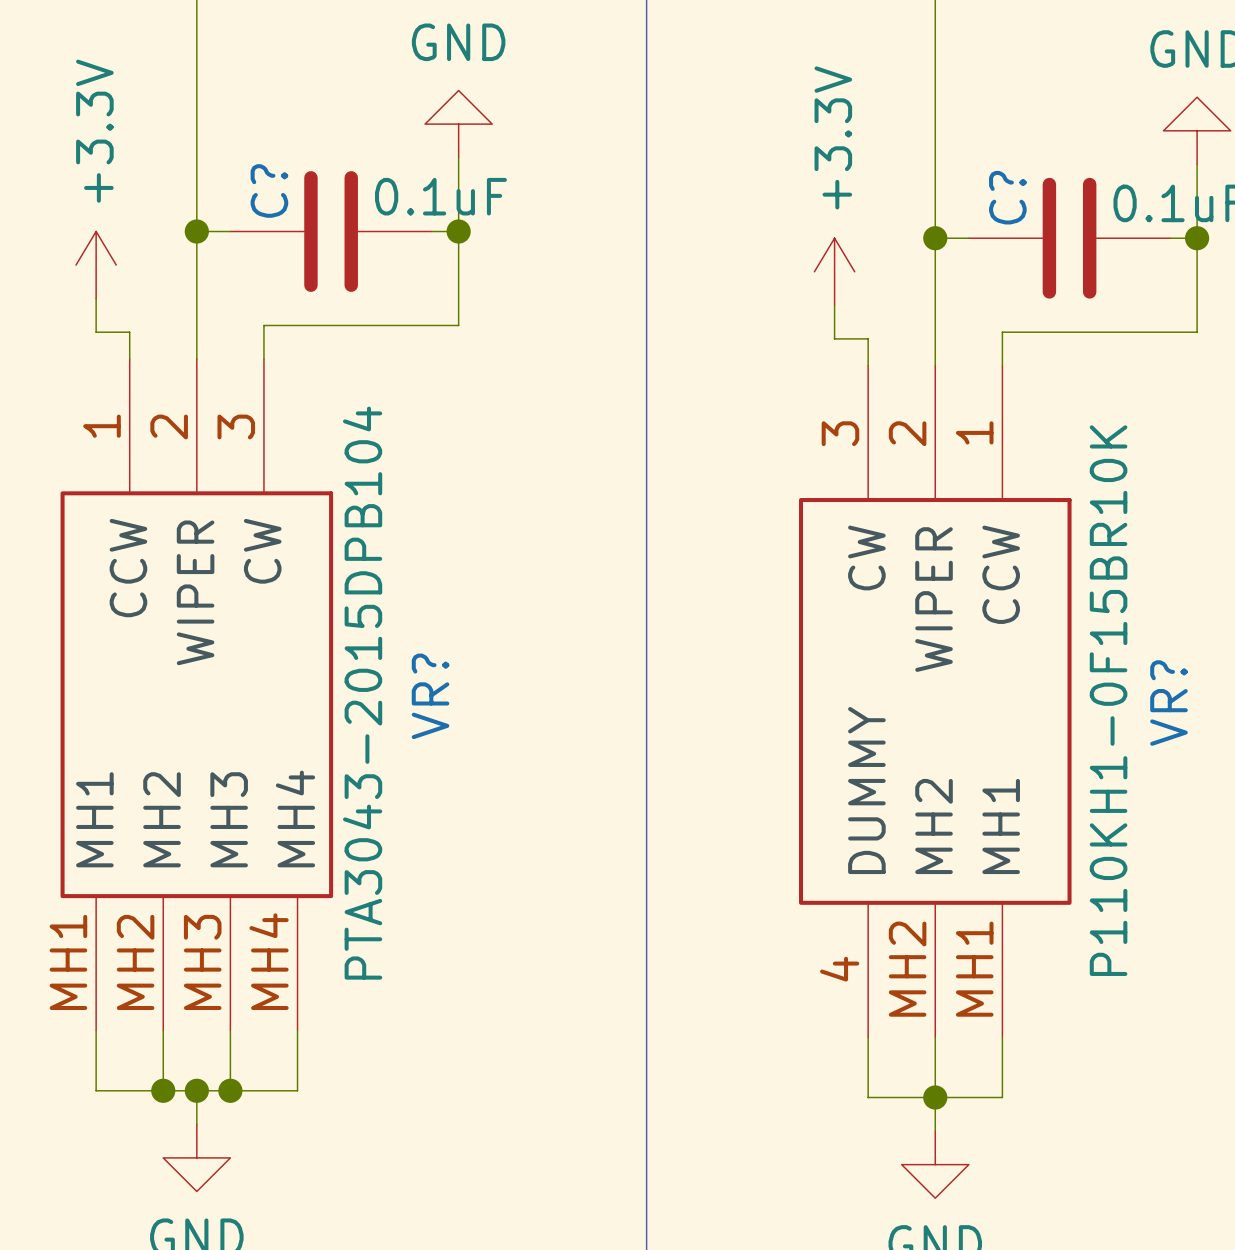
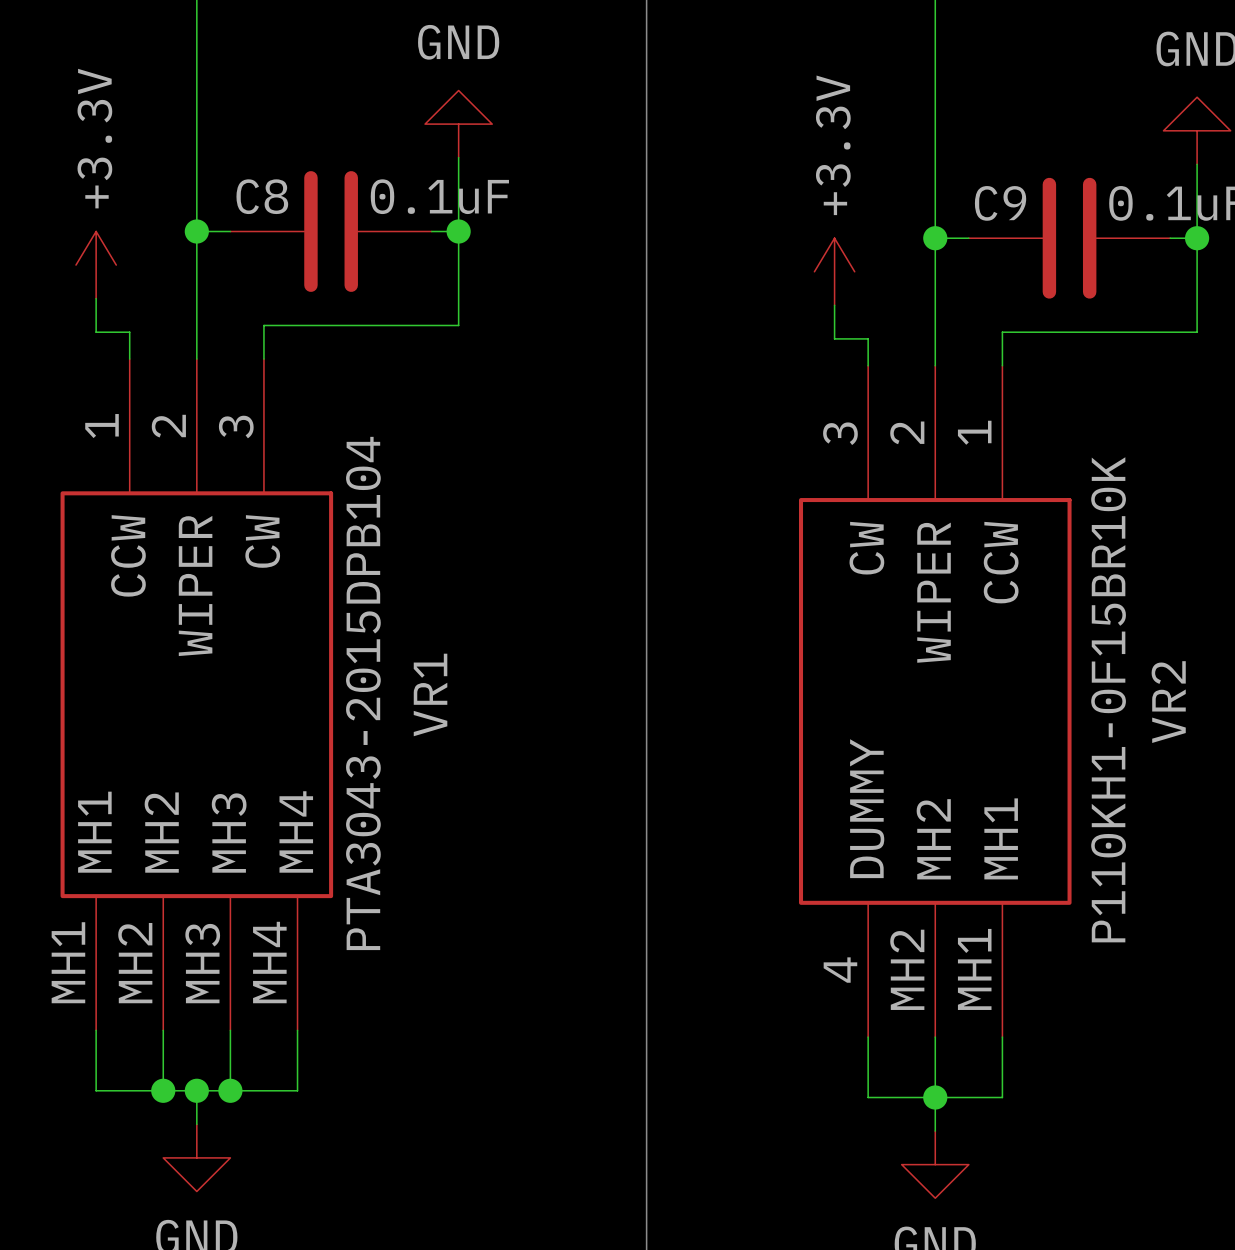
C? name: C? (269, 190) -> C8 (262, 196)
C? name: C? (1007, 197) -> C9 (1000, 203)
VR? name: VR? (430, 696) -> VR1 (430, 694)
VR? name: VR? (1168, 703) -> VR2 (1168, 702)

